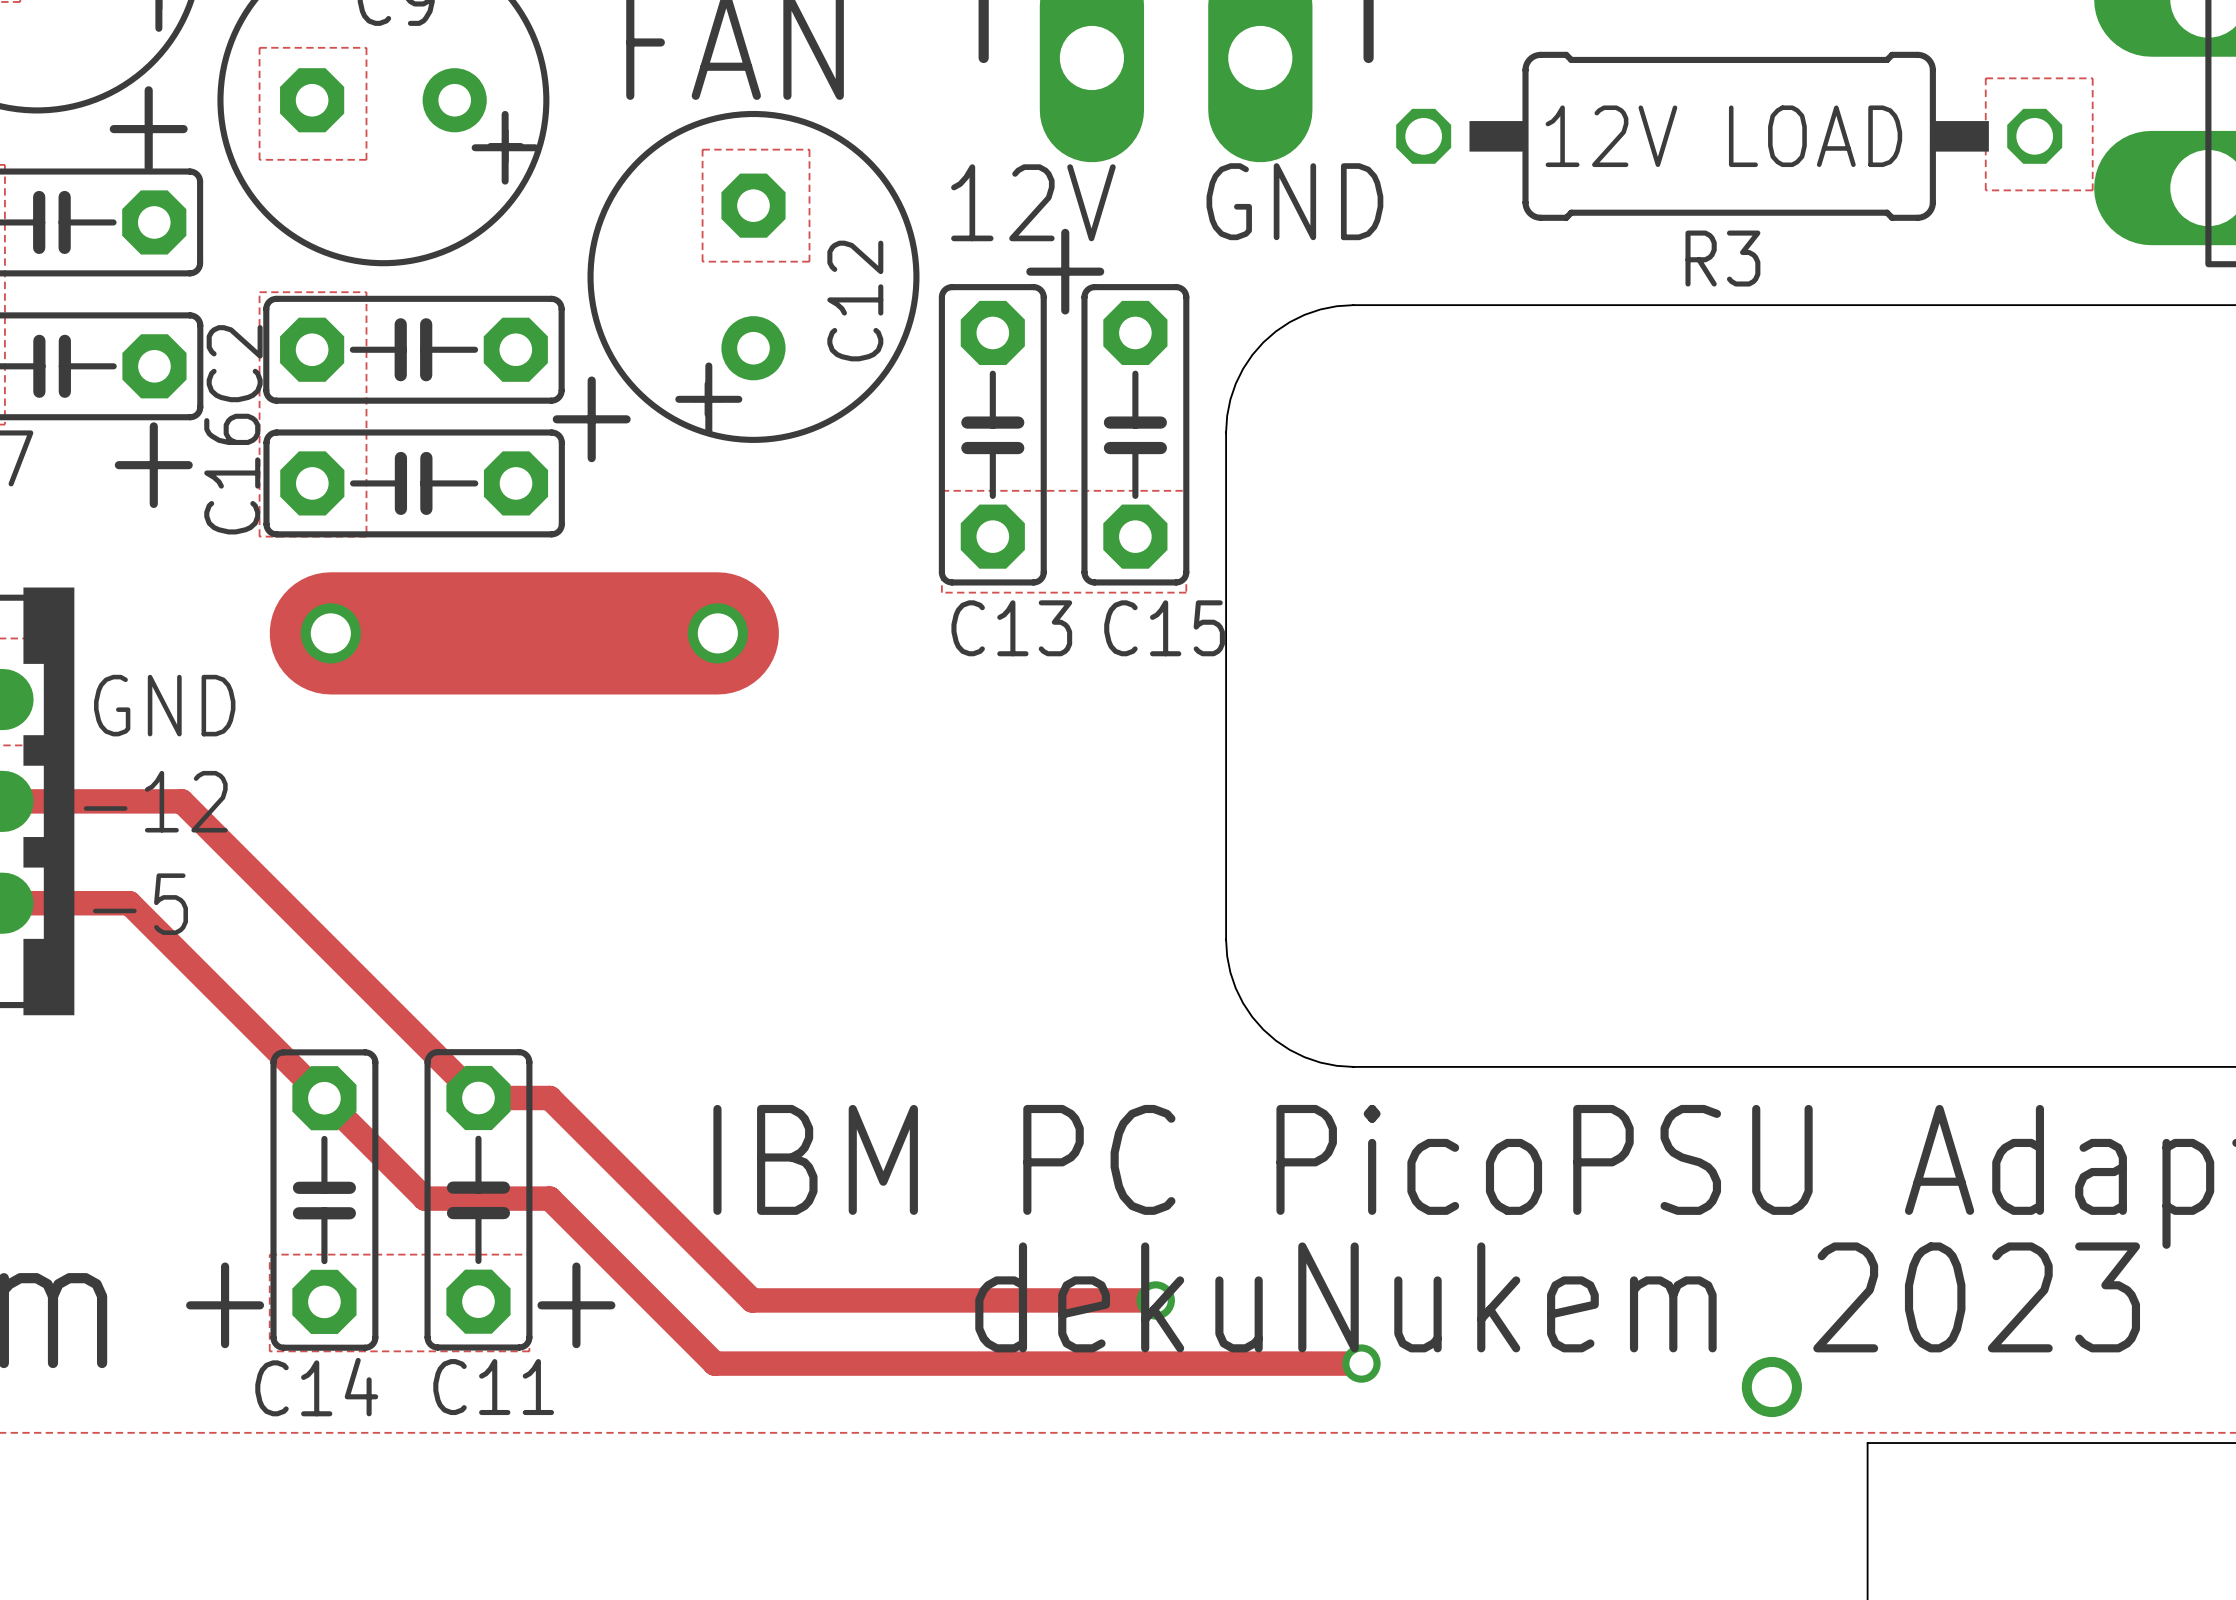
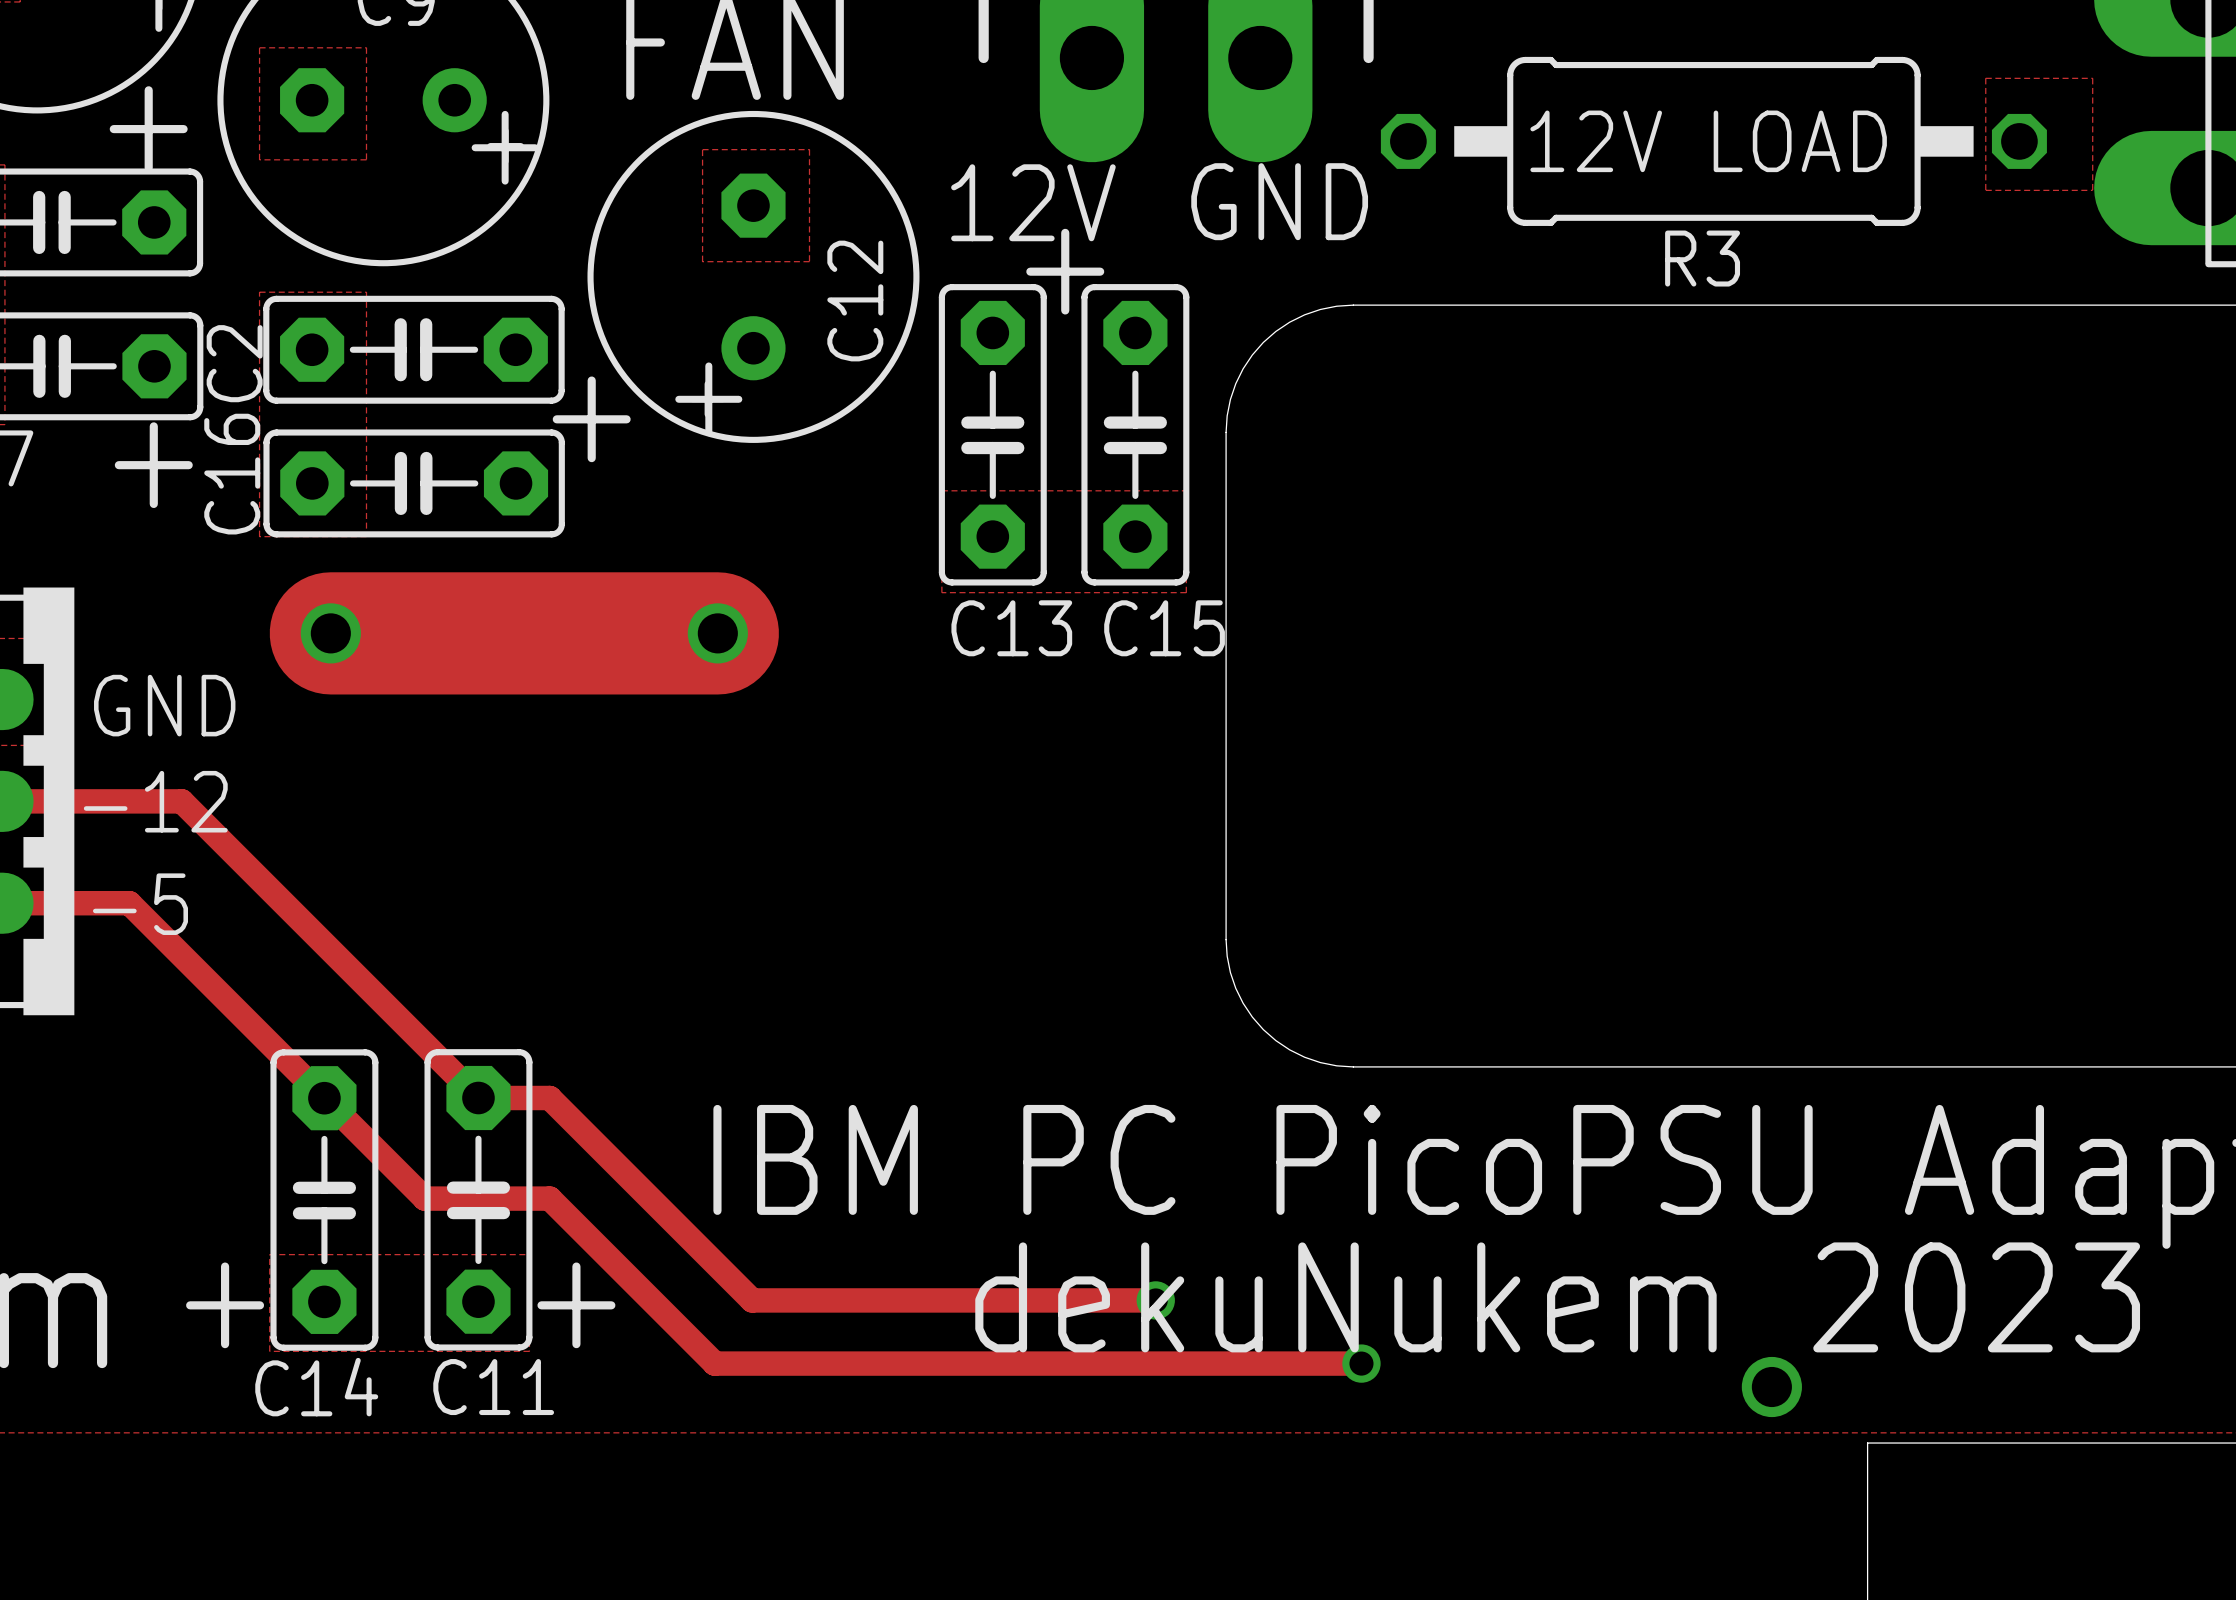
text position: 12V LOAD (1723, 136) -> 12V LOAD (1708, 141)
R3 position: (1729, 136) -> (1713, 141)
text position: GND (1294, 201) -> GND (1279, 201)
R3 name position: R3 (1722, 258) -> R3 (1702, 258)

